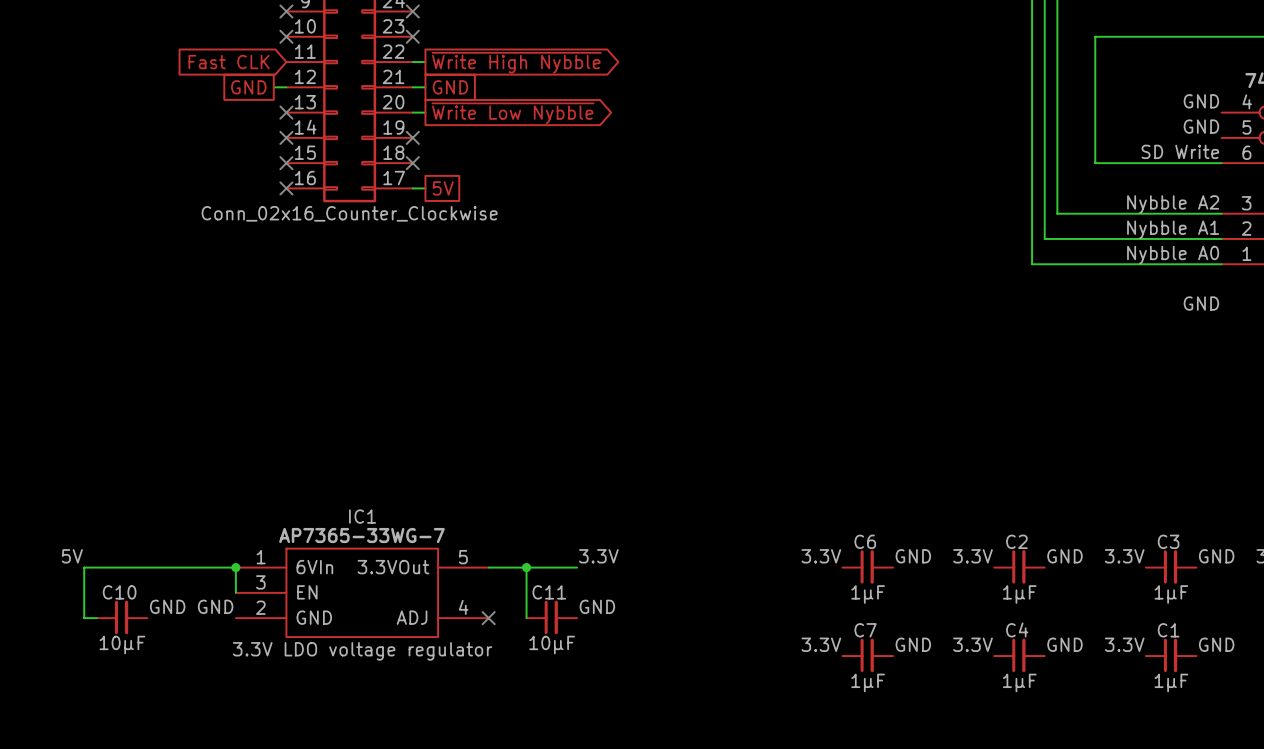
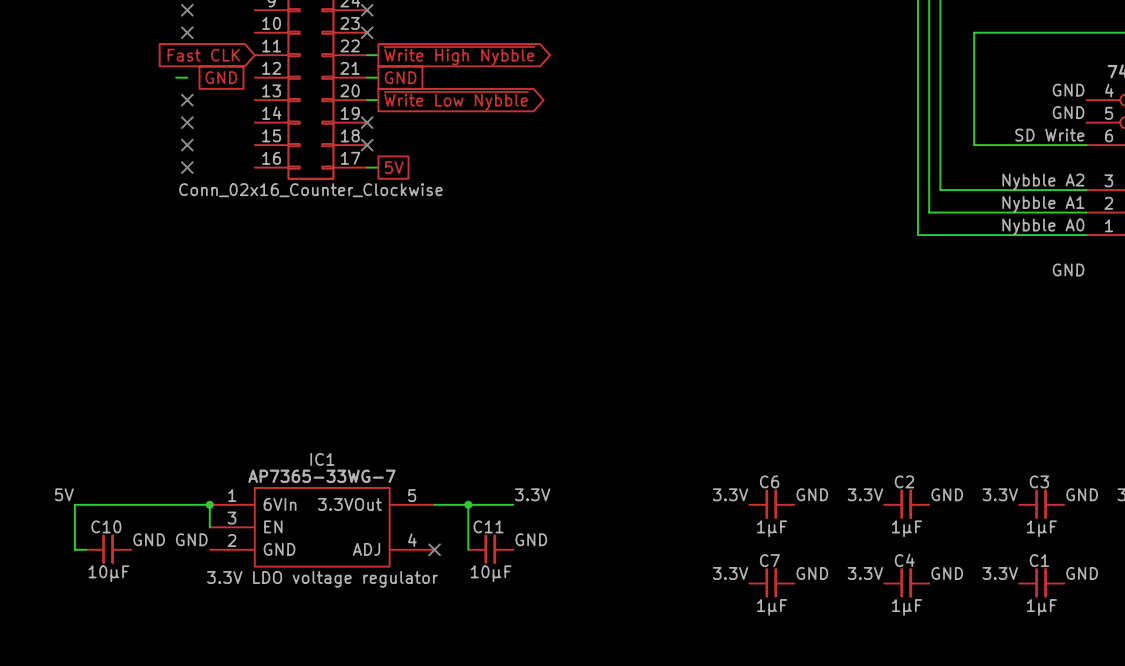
no-connect mark: none -> (187, 10)
no-connect mark: (286, 11) -> none
no-connect mark: none -> (187, 32)
no-connect mark: (286, 36) -> none
wire: (273, 87) (286, 87) -> (176, 77) (187, 77)
no-connect mark: none -> (187, 100)
no-connect mark: (286, 112) -> none
no-connect mark: none -> (187, 122)
no-connect mark: (286, 137) -> none
no-connect mark: none -> (187, 145)
no-connect mark: (286, 163) -> none
no-connect mark: none -> (187, 167)
no-connect mark: (286, 188) -> none

